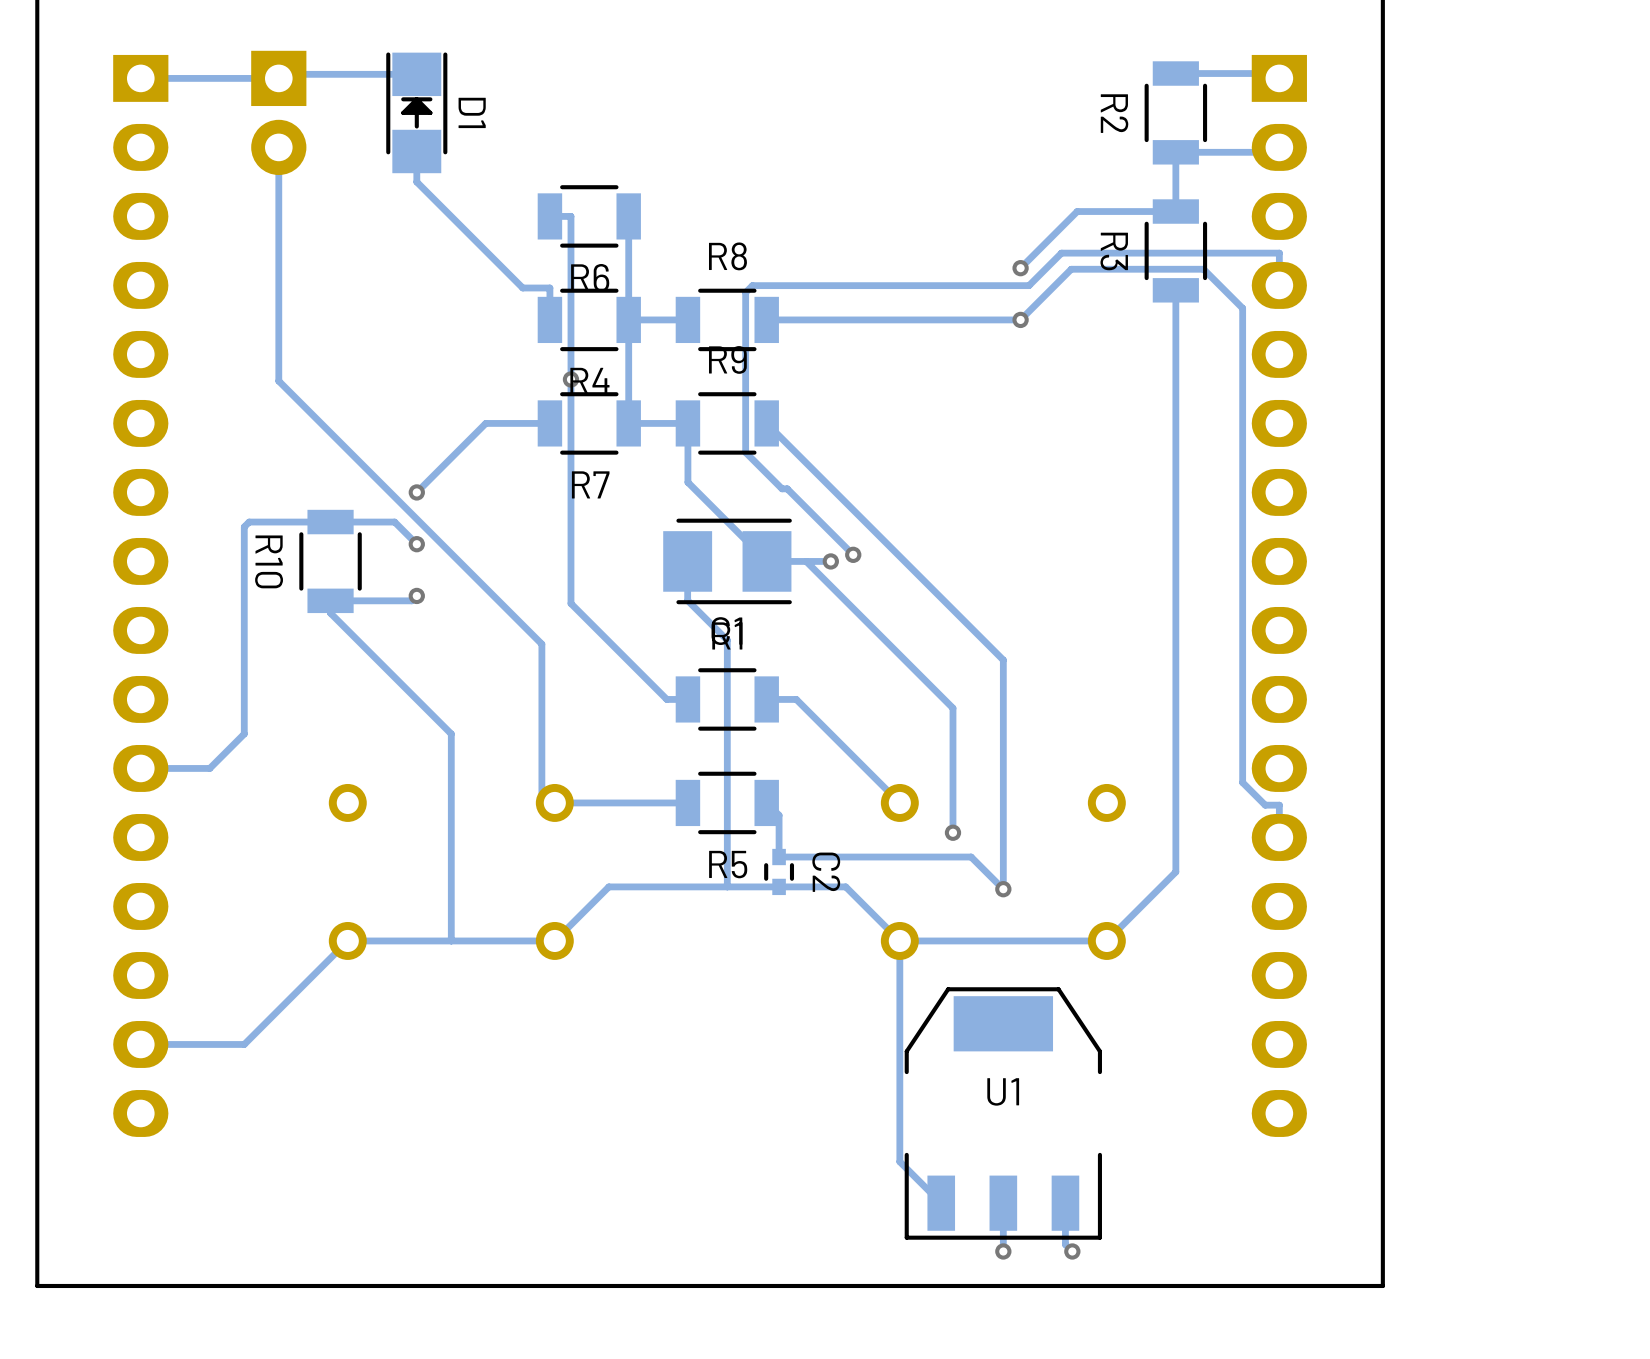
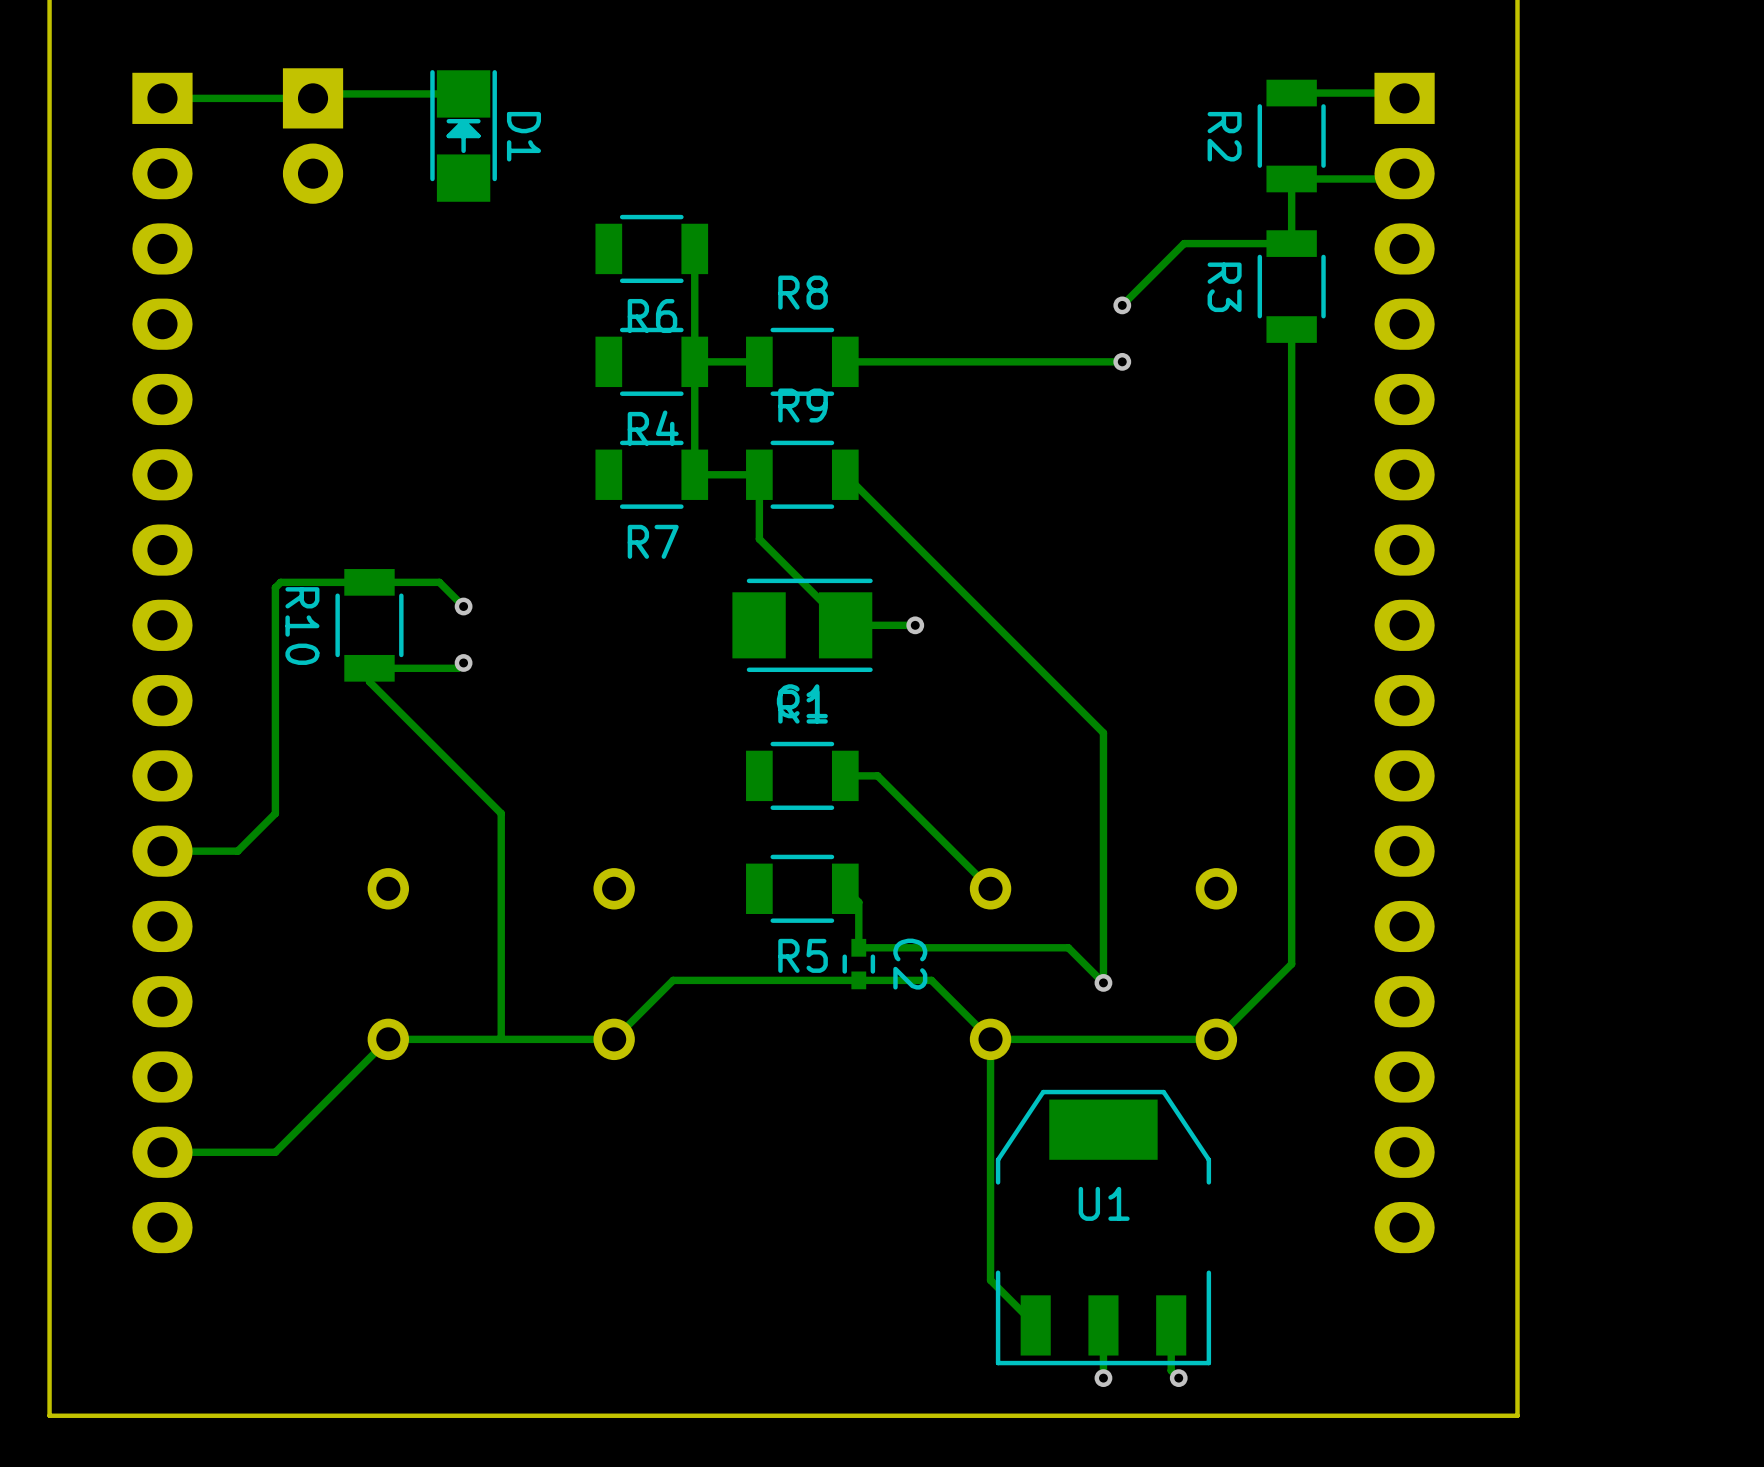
track: (278, 147) (278, 381) (541, 644) (541, 802) (687, 802) -> none
track: (416, 151) (416, 182) (522, 288) (549, 288) (549, 319) -> none
track: (549, 216) (570, 216) (570, 603) (666, 699) (687, 699) -> none
track: (1279, 285) (1279, 253) (1061, 253) (1029, 285) (752, 285) (745, 292) (745, 452) (782, 488) (787, 488) (853, 554) -> none
track: (1020, 319) (1071, 269) (1203, 269) (1242, 308) (1242, 782) (1265, 805) (1279, 805) (1279, 837) -> none
via: (570, 379) -> none
track: (549, 423) (485, 423) (416, 492) -> none
via: (416, 492) -> none
via: (853, 554) -> none
track: (687, 561) (687, 600) (727, 640) (727, 886) -> none
track: (806, 561) (952, 708) (952, 832) -> none
via: (952, 832) -> none

